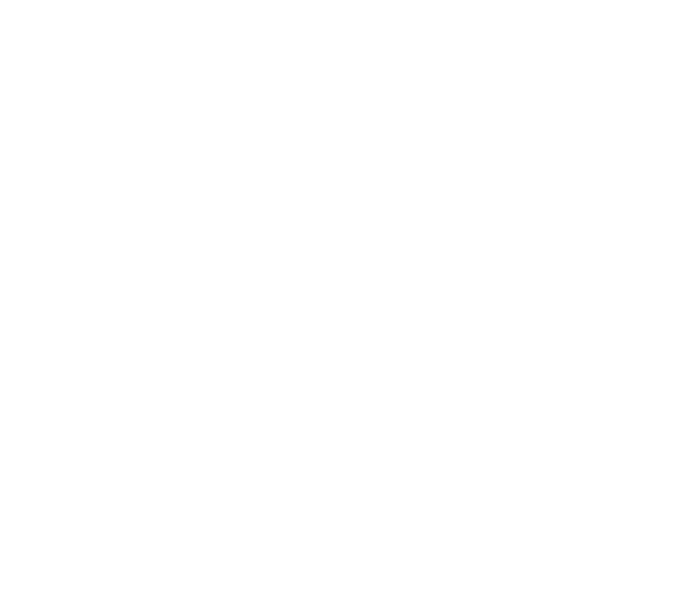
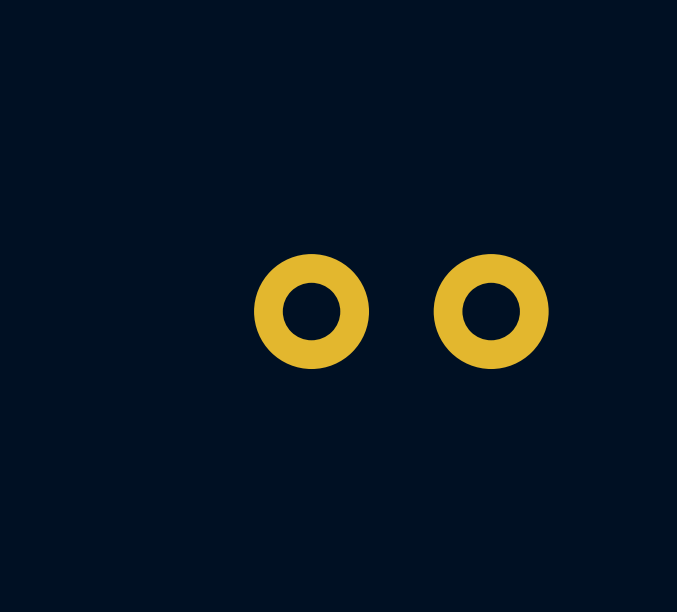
part: none -> (401, 311)

